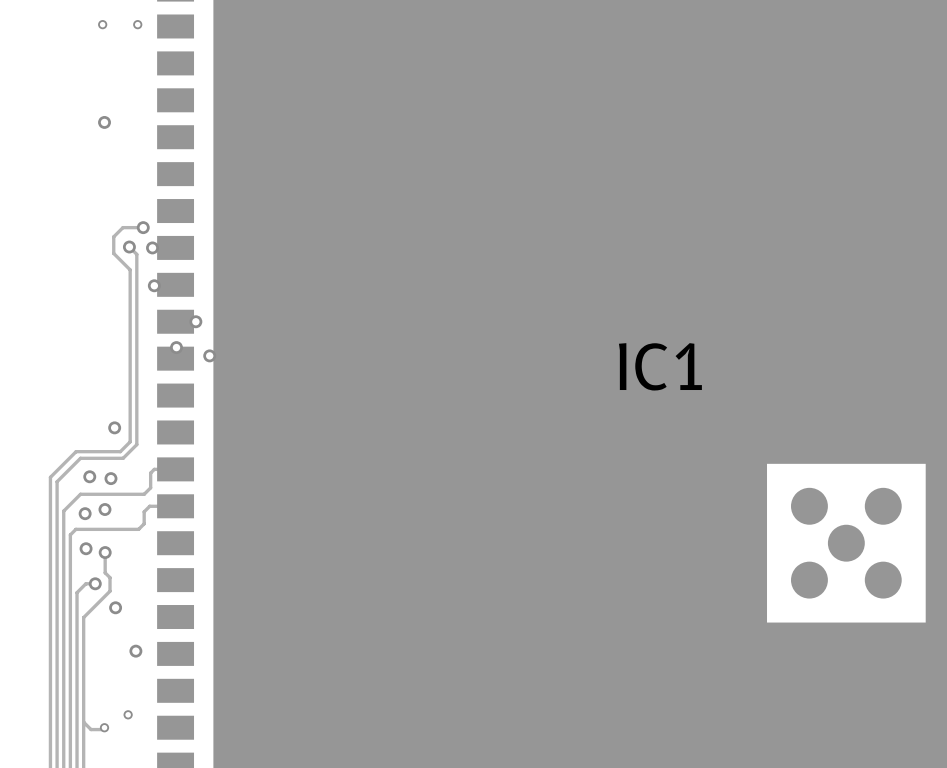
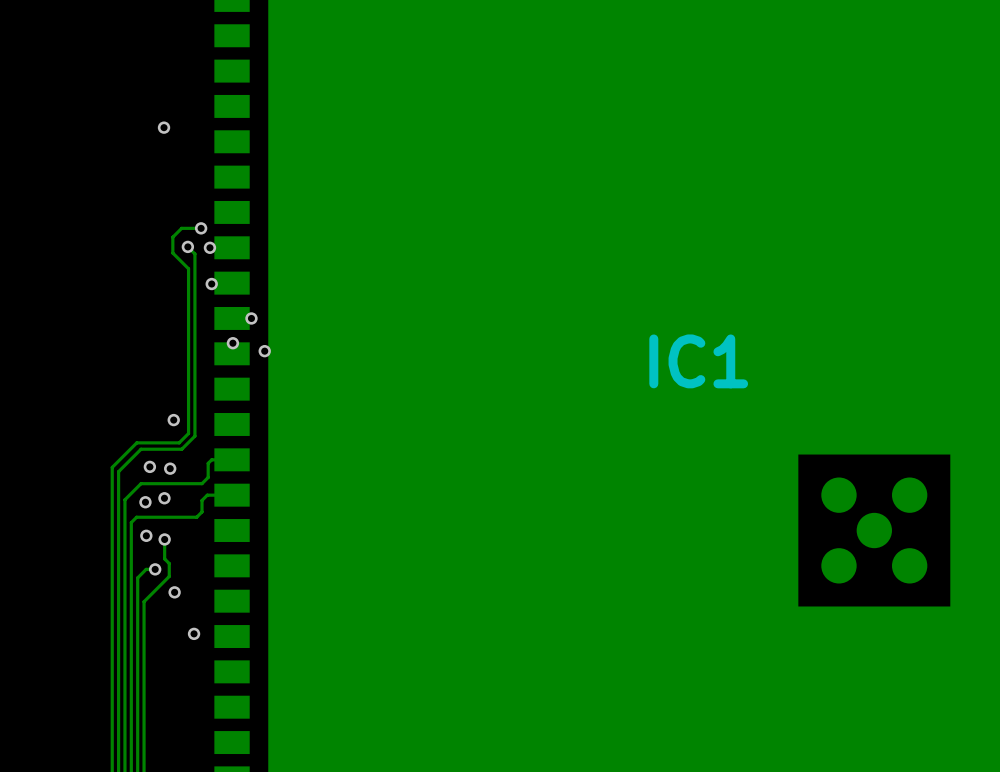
via: (102, 24) -> none
via: (137, 24) -> none
via: (128, 714) -> none
track: (83, 722) (91, 729) (102, 729) (104, 727) -> none
via: (104, 727) -> none

